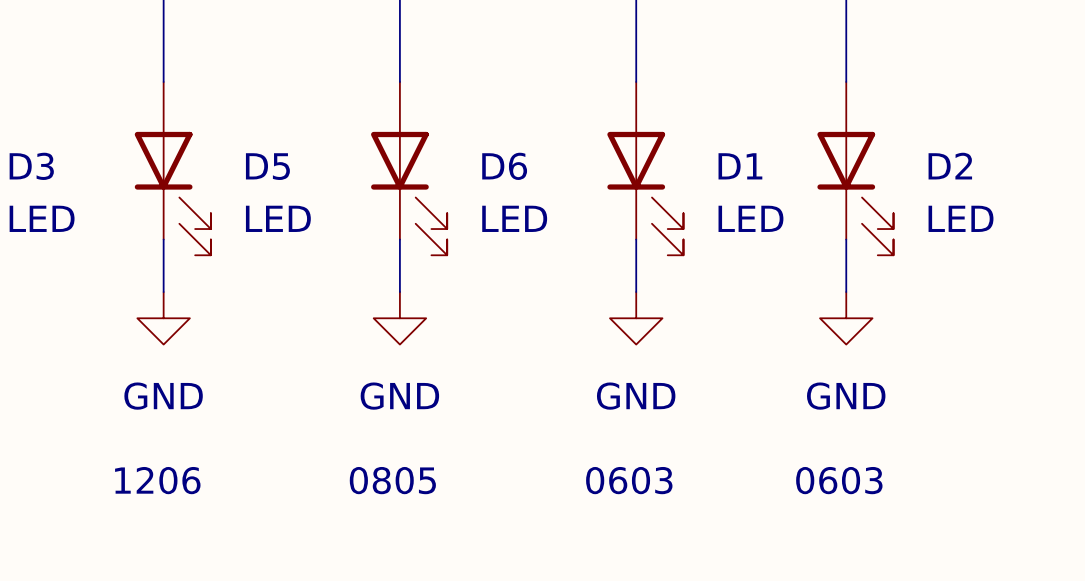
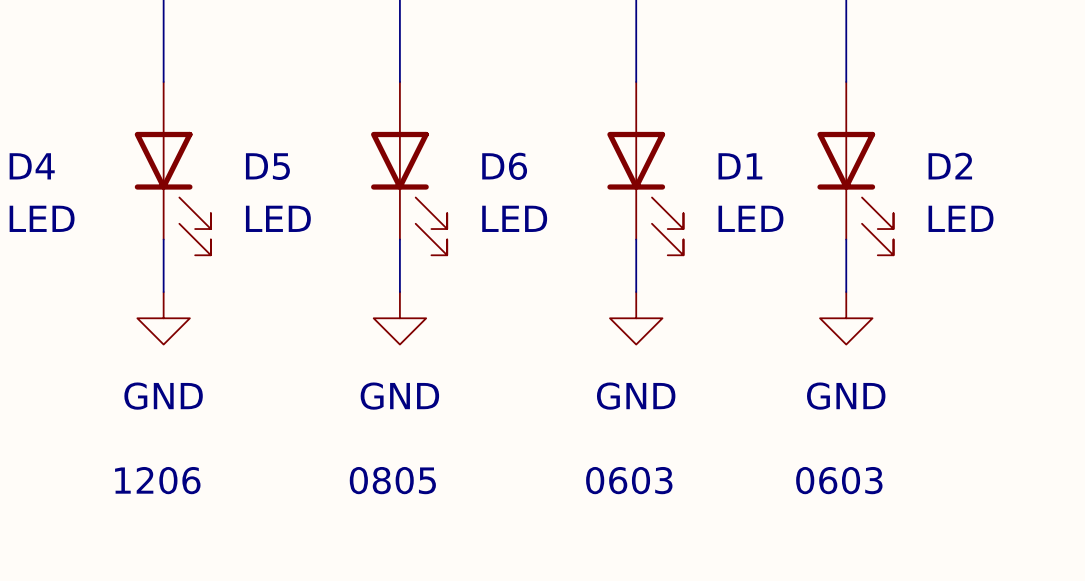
D3 name: D3 (31, 166) -> D4 (32, 166)

